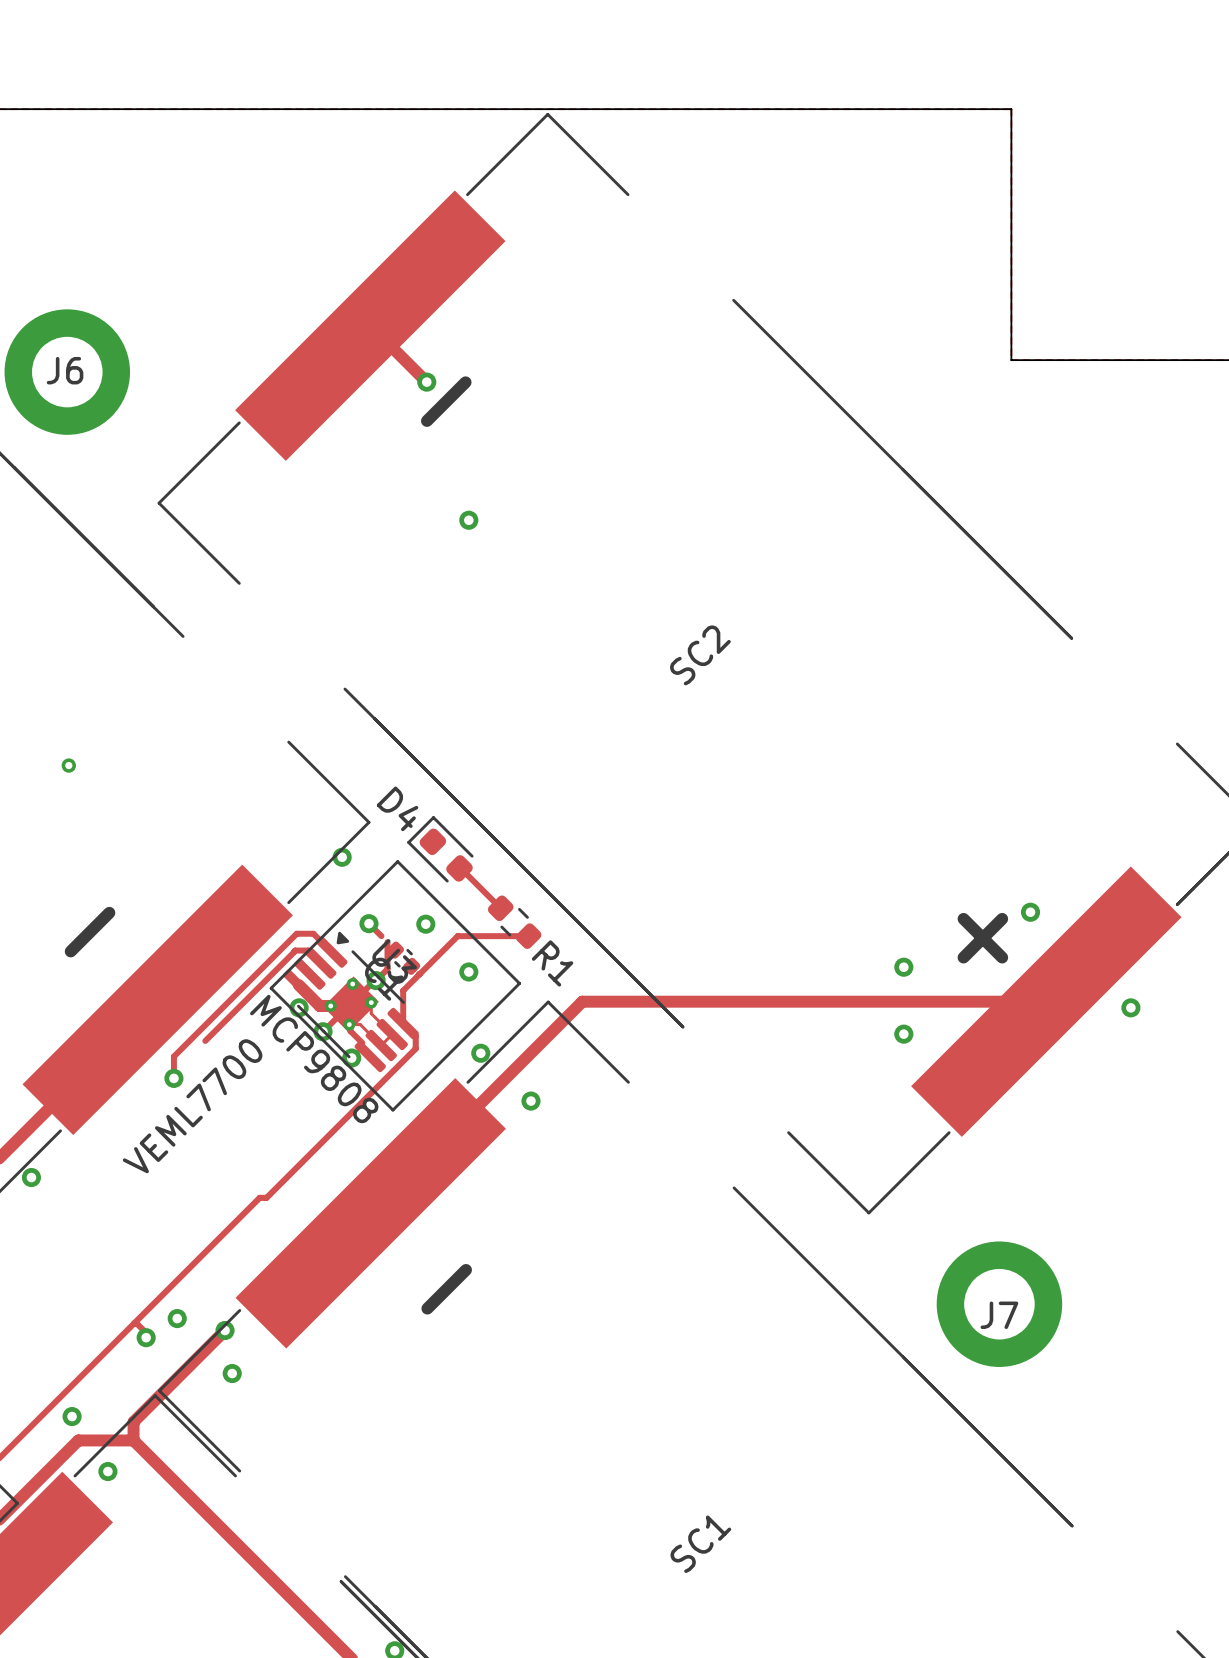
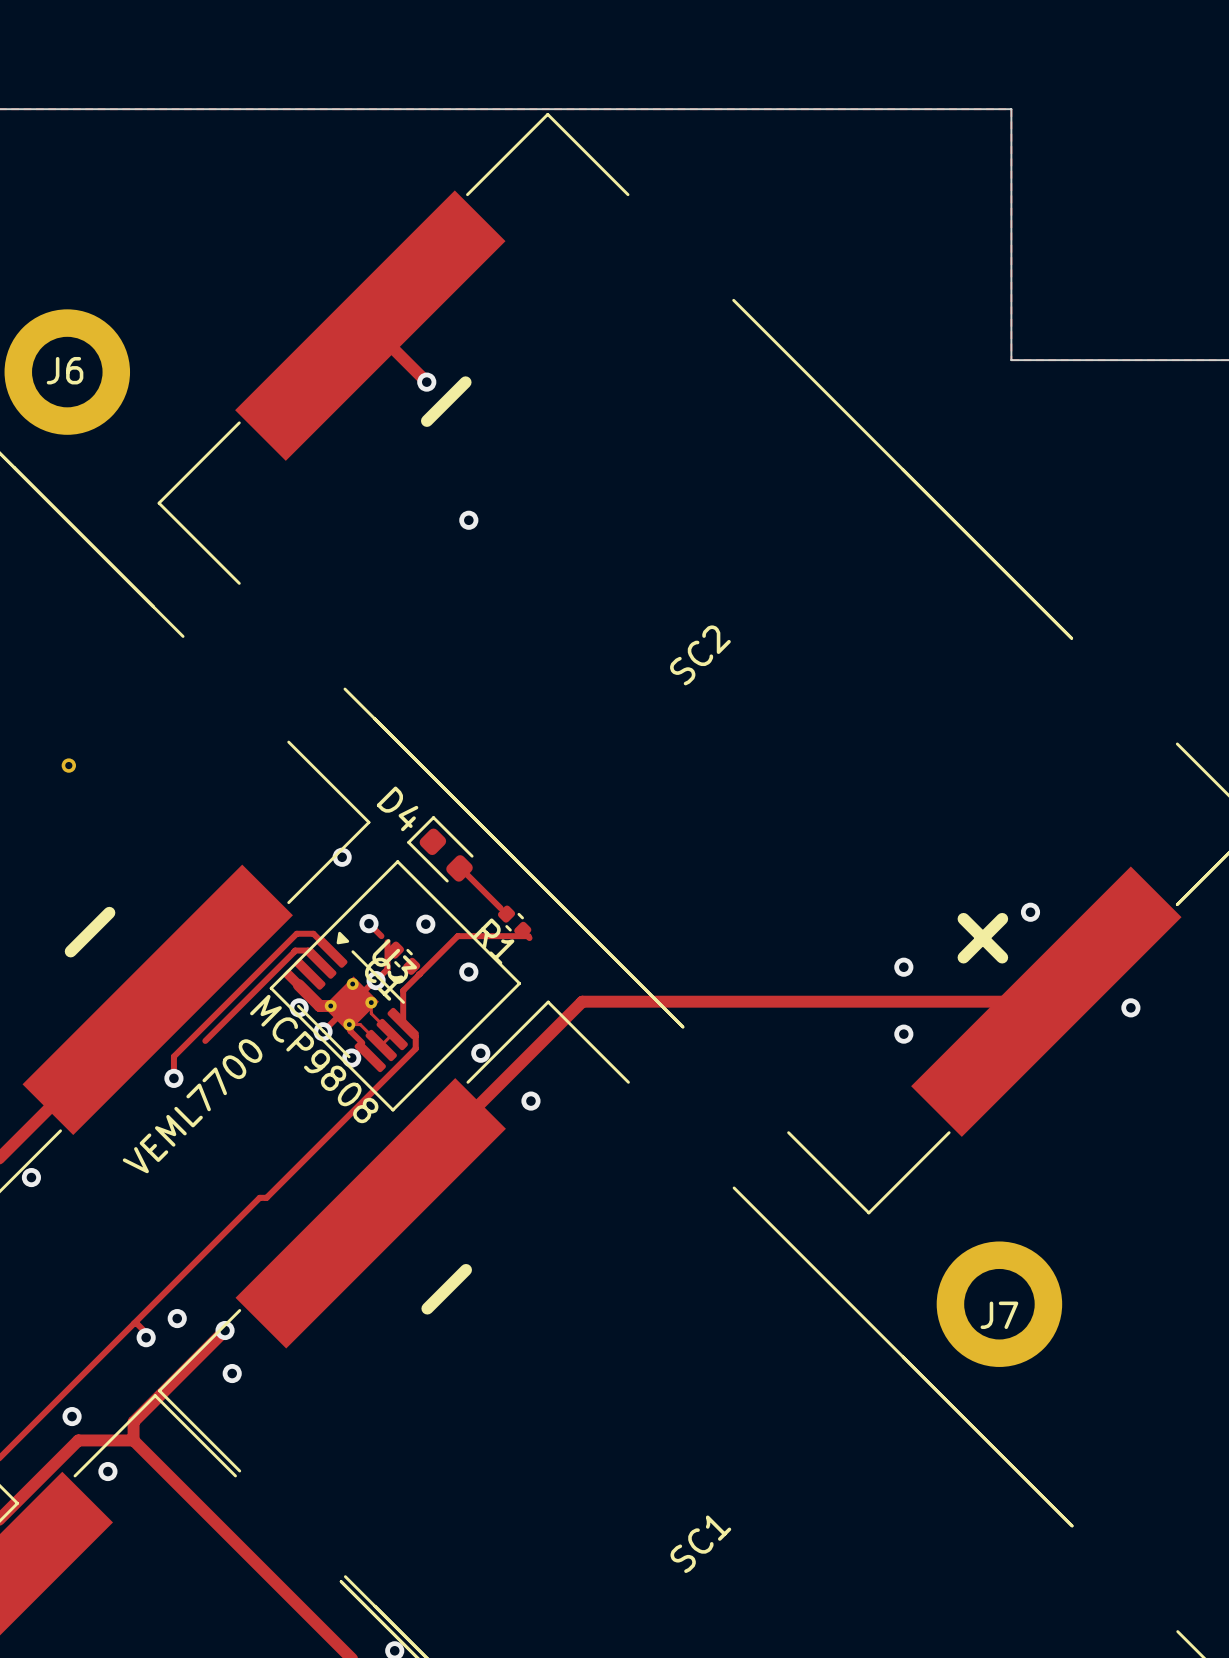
R1 footprint: [487, 895, 542, 949] -> [497, 905, 532, 939]
R1 name position: R1 (552, 963) -> R1 (493, 941)

